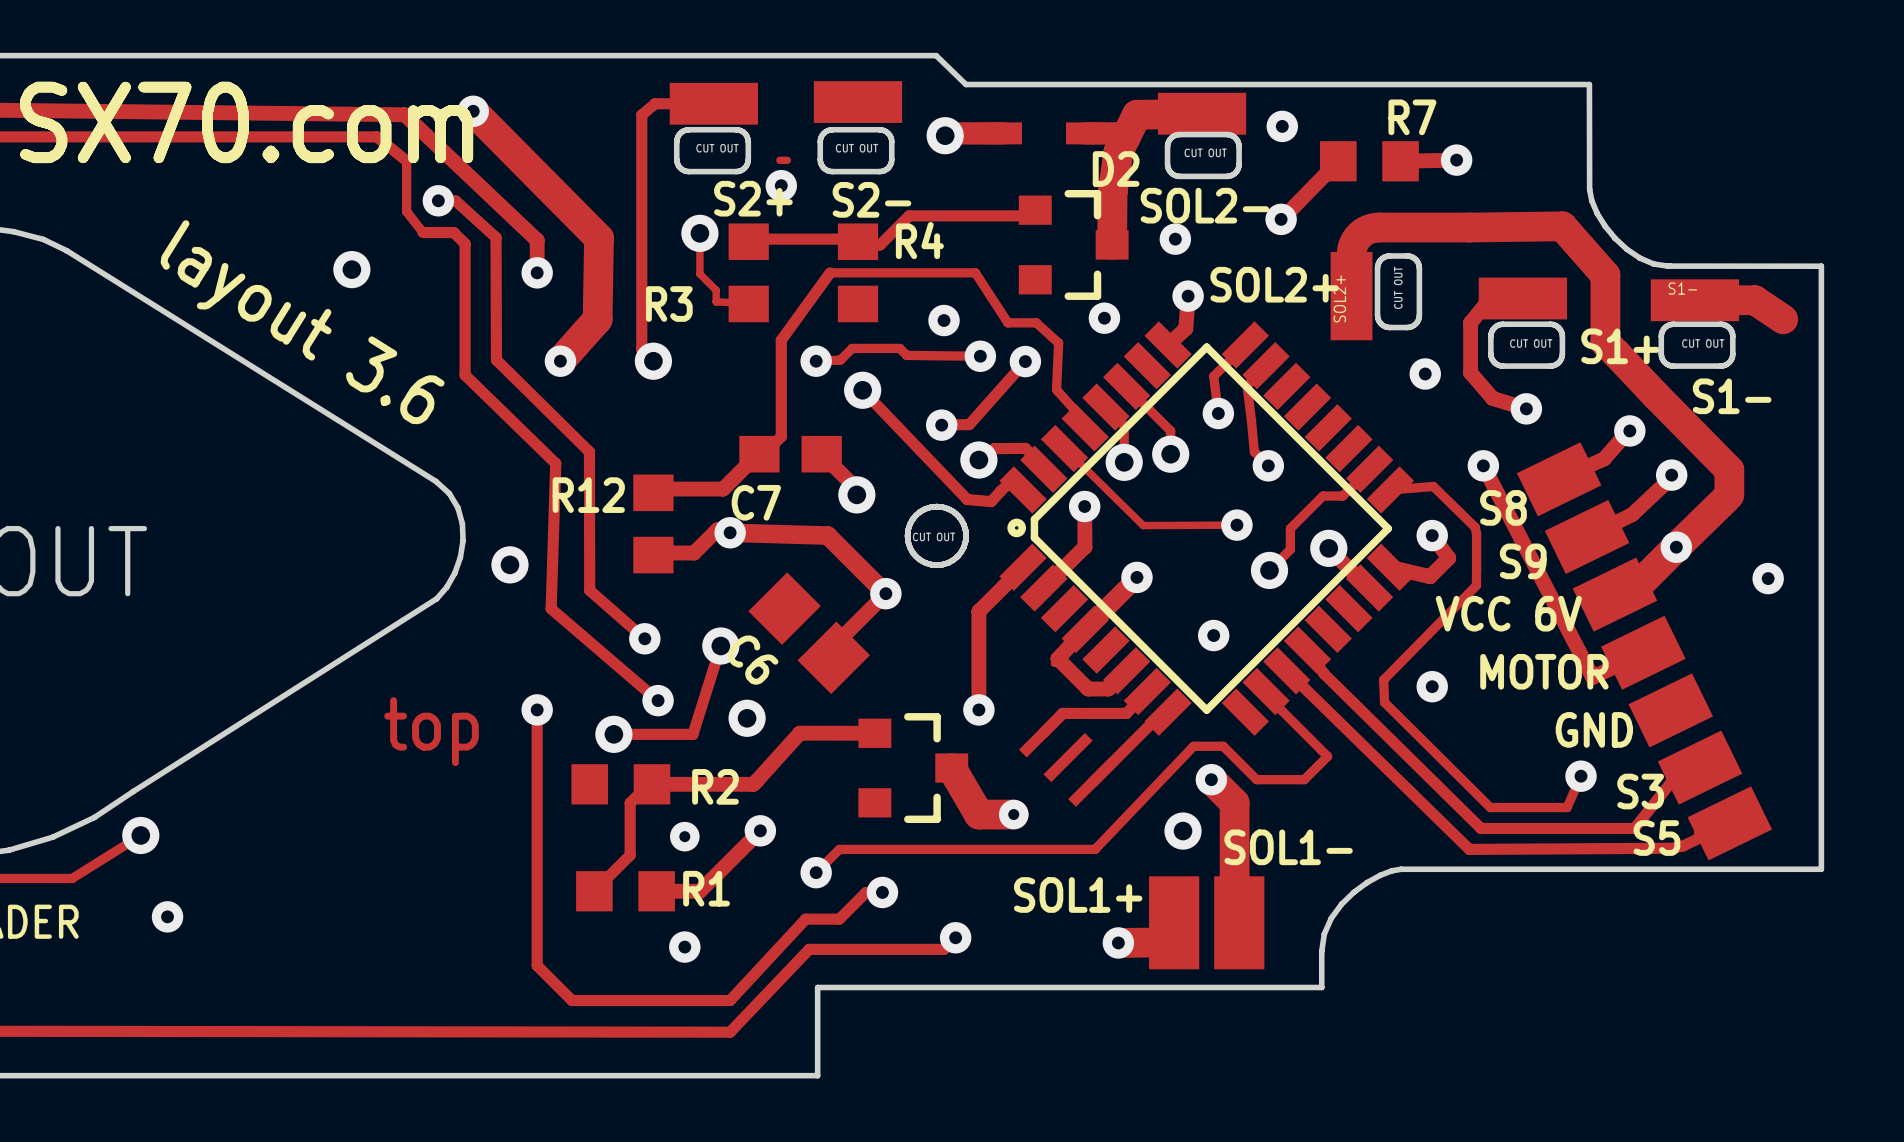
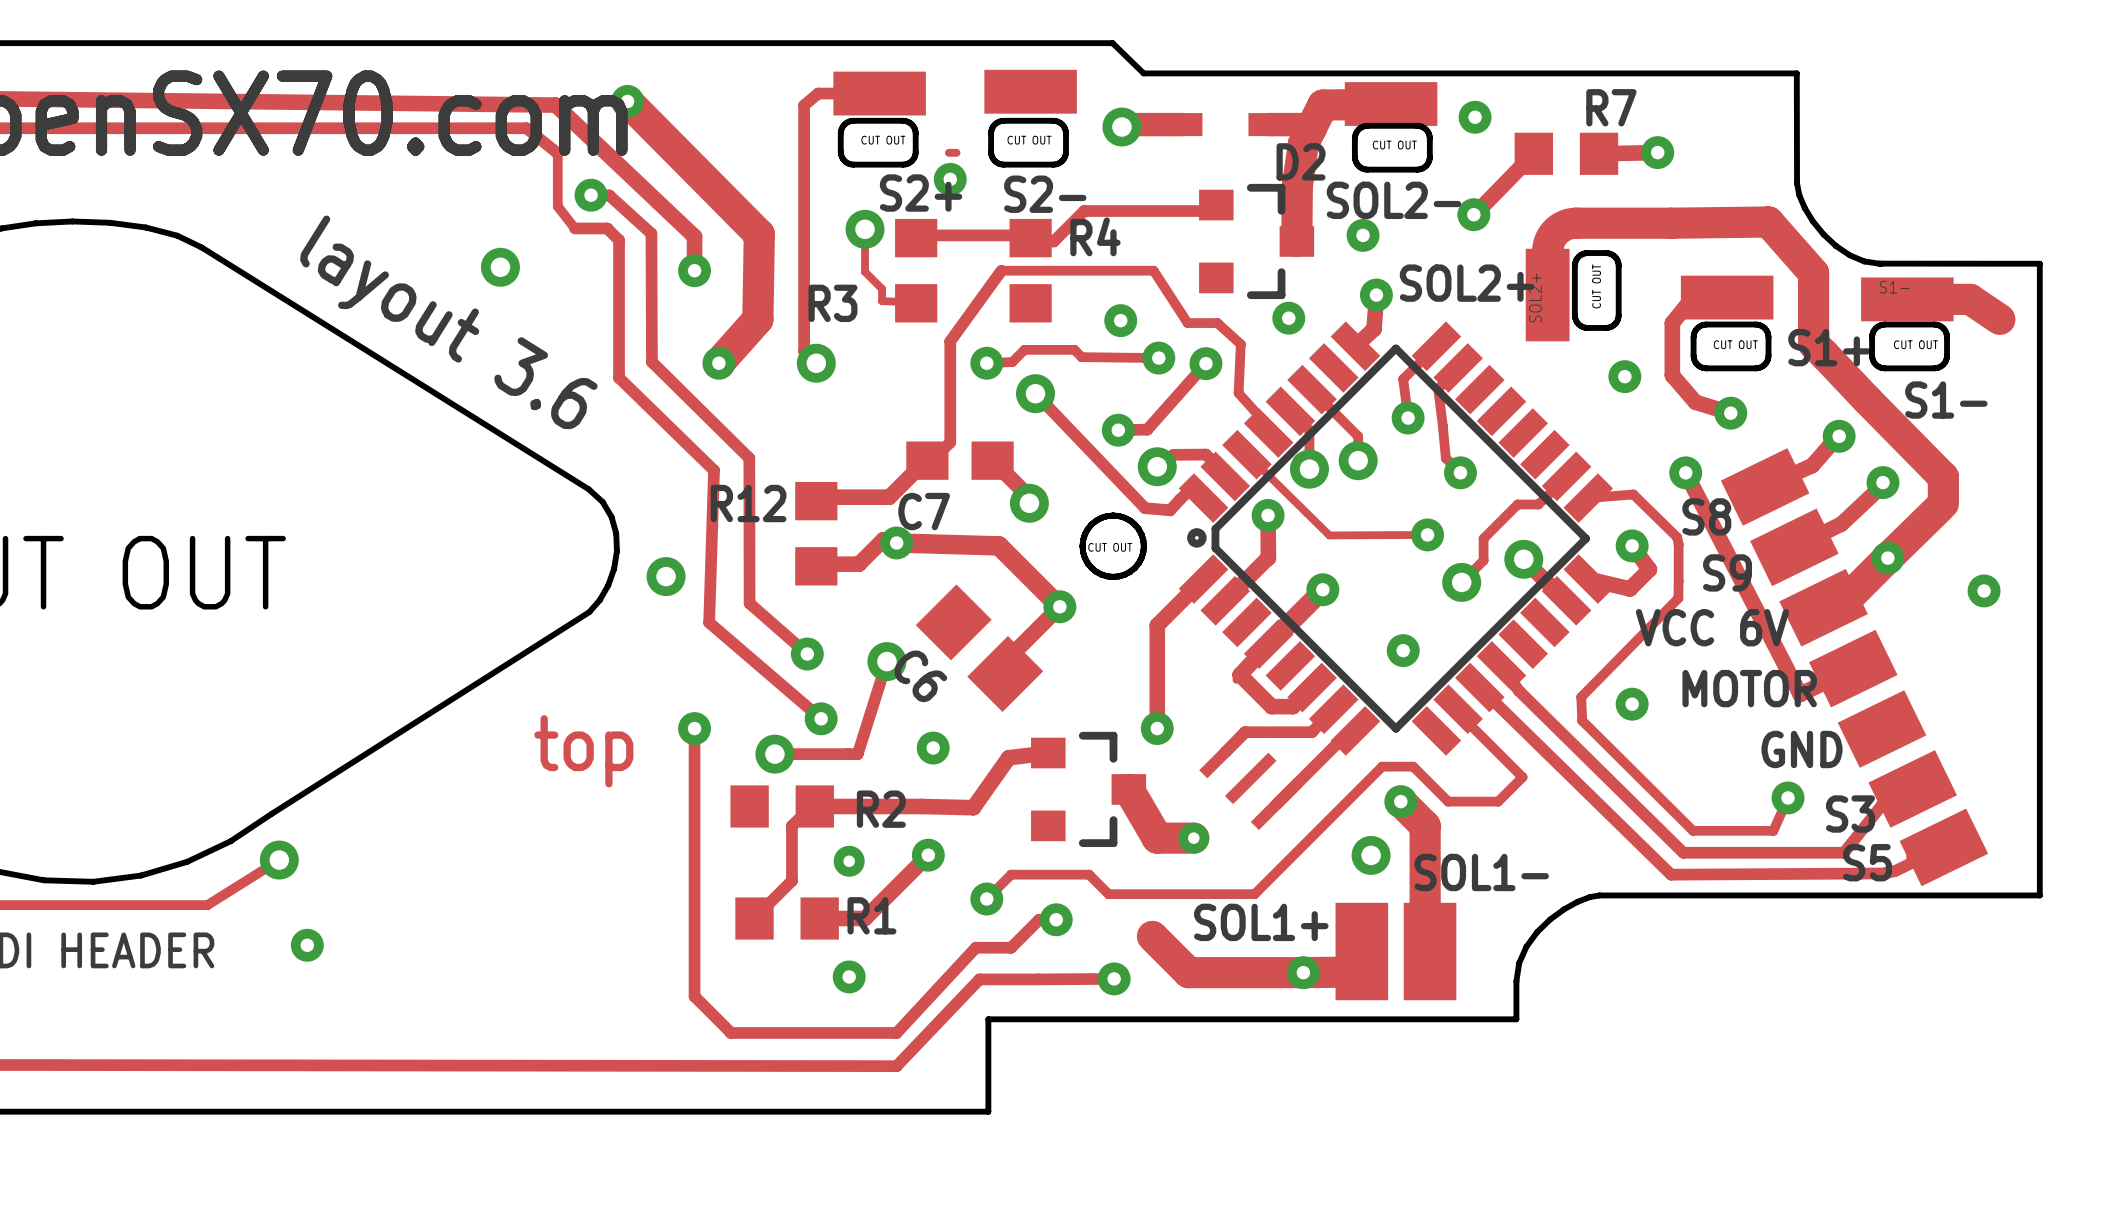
via position: (747, 718) -> (933, 748)
track: (874, 733) (799, 733) (753, 784) -> (1048, 753) (1008, 757) (973, 807) (921, 806)
track: (1193, 746) (1095, 849) (913, 849) -> (1382, 766) (1254, 894) (1108, 894) (1089, 874)
track: none -> (1152, 936) (1188, 972) (1303, 972)
track: (955, 937) (944, 949) (864, 949) -> (1114, 978) (1037, 979)
via position: (955, 937) -> (1114, 978)

